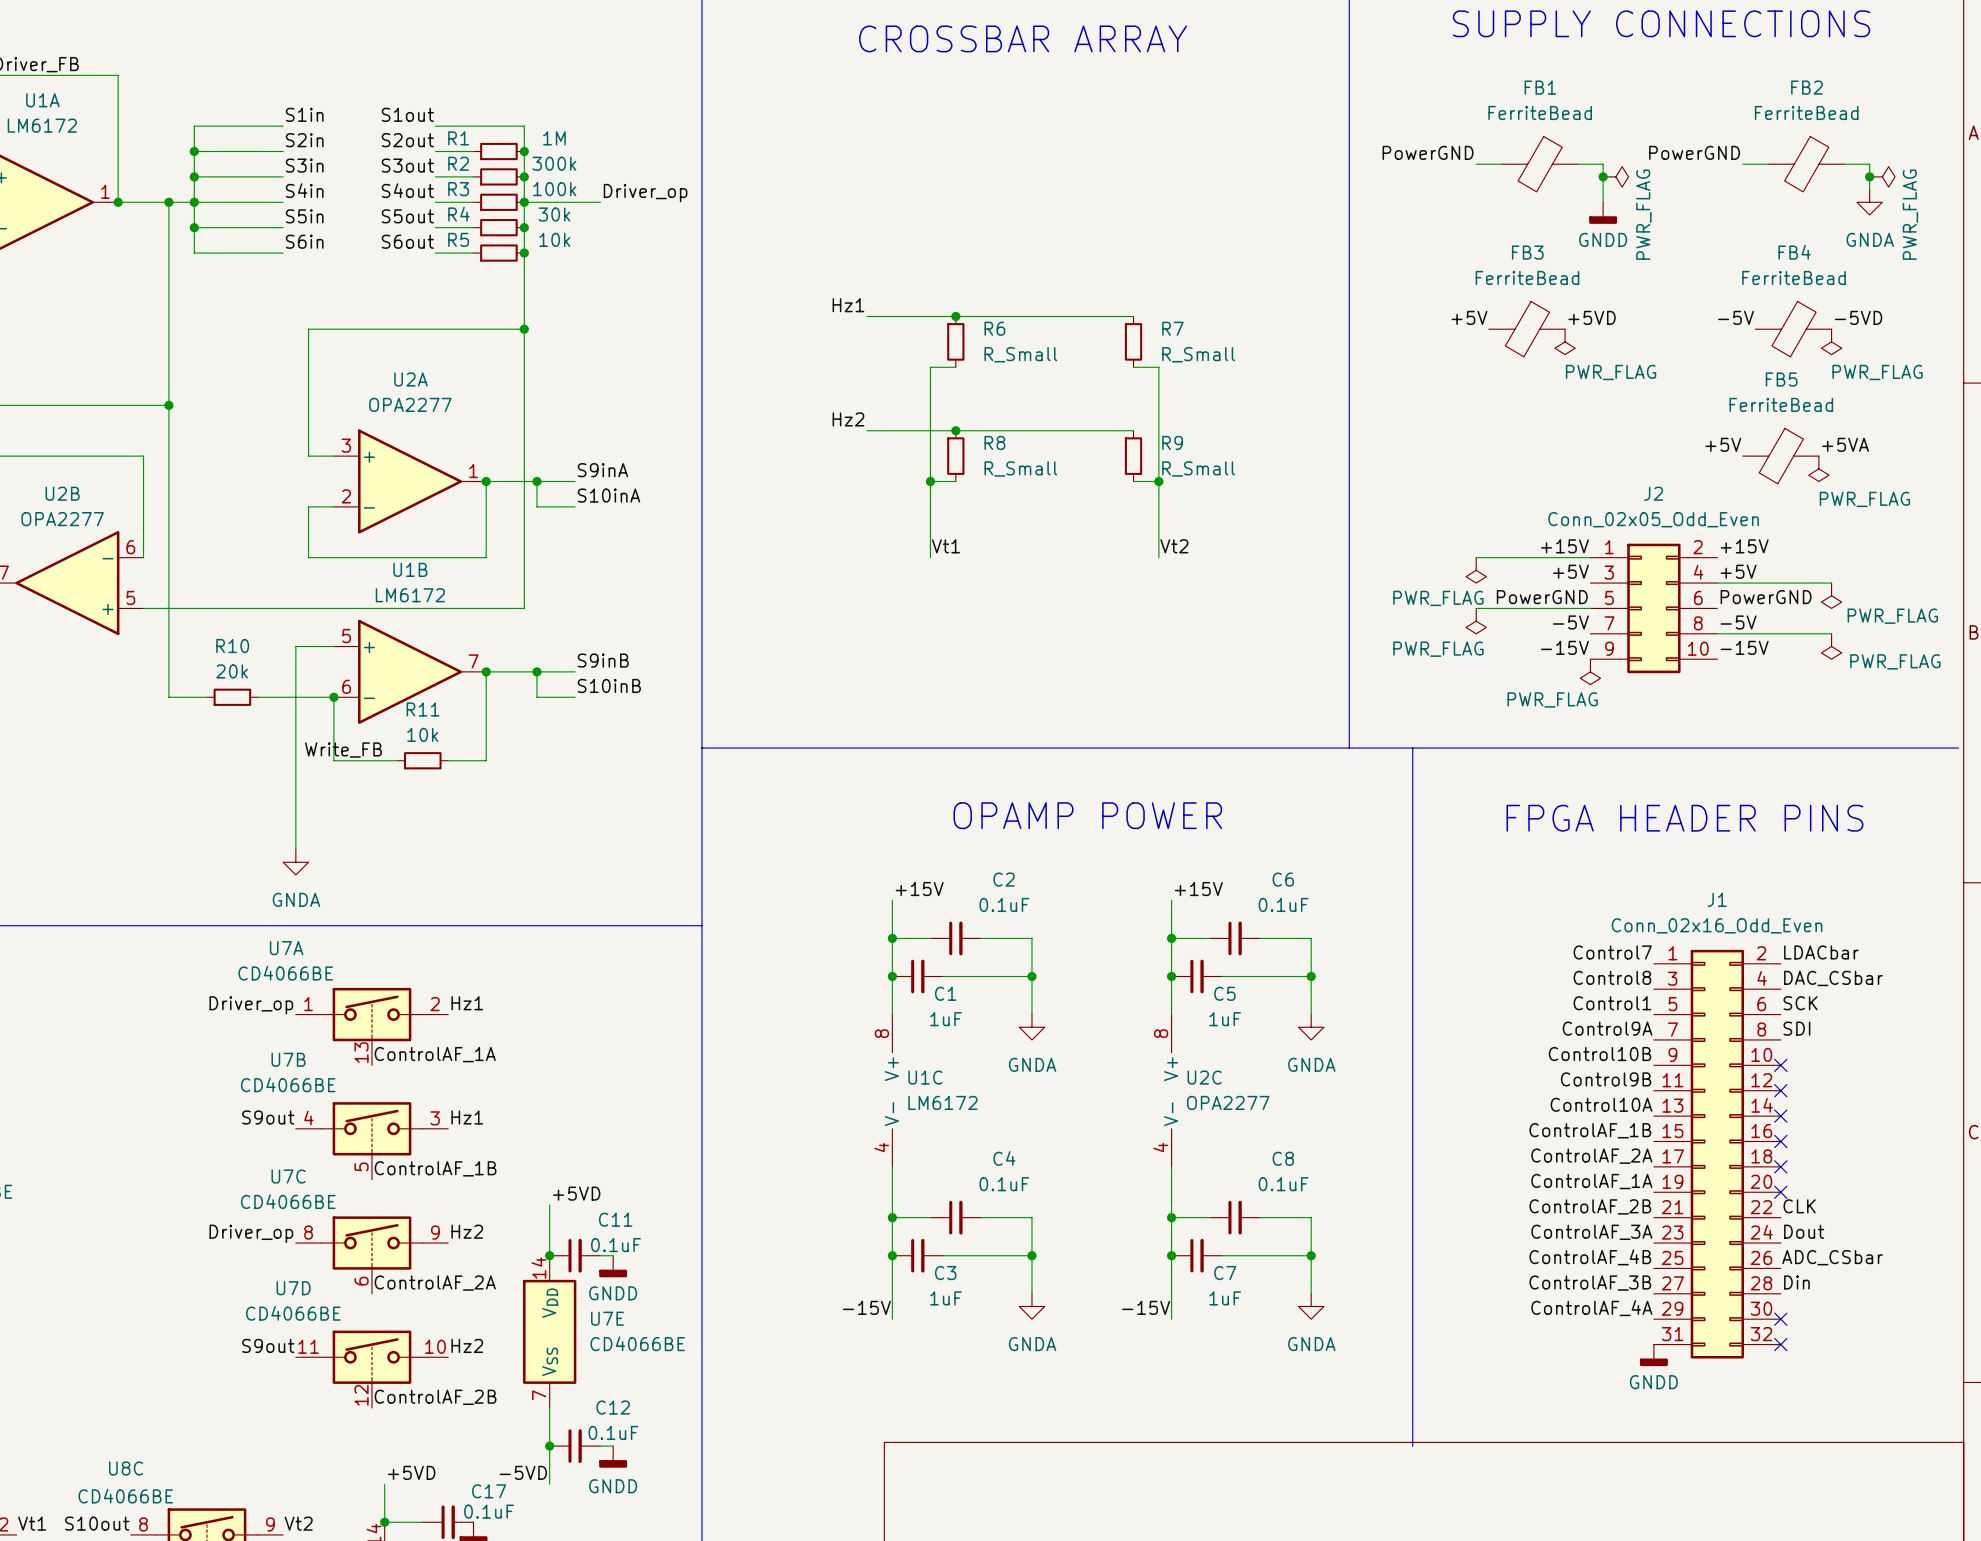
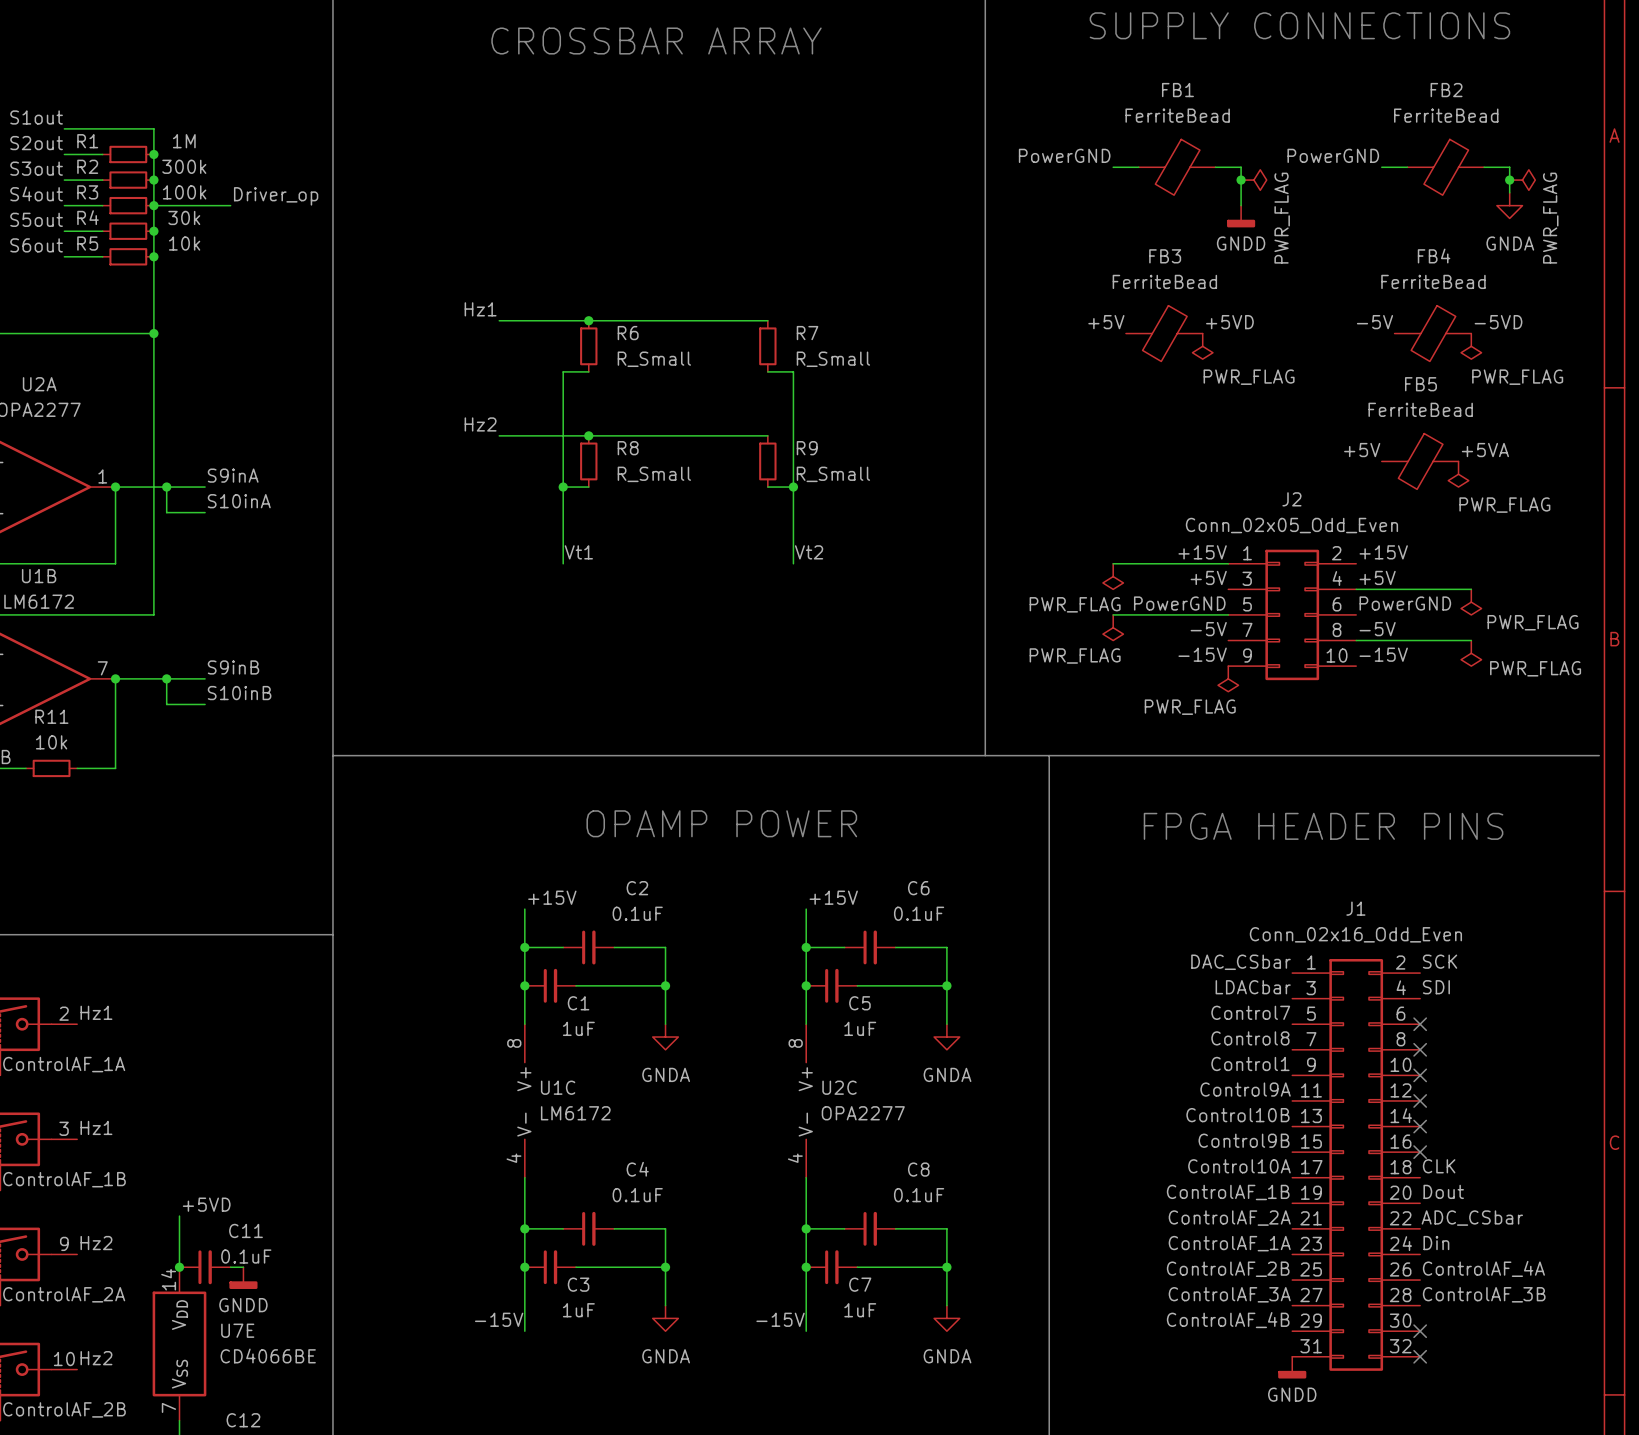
label: Control7 (1612, 952) -> DAC_CSbar (1240, 962)
label: LDACbar (1821, 952) -> SCK (1440, 961)
label: Control8 (1612, 977) -> LDACbar (1253, 987)
label: DAC_CSbar (1833, 978) -> SDI (1436, 987)
label: Control1 (1612, 1003) -> Control7 (1250, 1012)
label: SCK (1800, 1003) -> none
no-connect mark: none -> (1420, 1024)
label: Control9A (1607, 1028) -> Control8 (1250, 1038)
label: SDI (1796, 1028) -> none
no-connect mark: none -> (1420, 1049)
label: Control10B (1600, 1054) -> Control1 (1250, 1063)
label: Control9B (1606, 1079) -> Control9A (1245, 1089)
label: Control10A (1601, 1104) -> Control10B (1237, 1115)
label: ControlAF_1B (1590, 1130) -> Control9B (1244, 1140)
label: none -> CLK (1439, 1166)
label: ControlAF_2A (1591, 1156) -> Control10A (1239, 1166)
no-connect mark: (1780, 1166) -> none
label: none -> Dout (1443, 1191)
label: ControlAF_1A (1591, 1181) -> ControlAF_1B (1228, 1192)
no-connect mark: (1780, 1192) -> none
label: ControlAF_2B (1590, 1206) -> ControlAF_2A (1229, 1218)
label: CLK (1799, 1206) -> ADC_CSbar (1472, 1218)
label: Dout (1804, 1231) -> Din (1436, 1243)
label: ControlAF_3A (1591, 1232) -> ControlAF_1A (1229, 1243)
label: ControlAF_4B (1590, 1257) -> ControlAF_2B (1228, 1269)
label: ADC_CSbar (1832, 1257) -> ControlAF_4A (1483, 1268)
label: Din (1796, 1282) -> ControlAF_3B (1484, 1294)
label: ControlAF_3B (1590, 1283) -> ControlAF_3A (1229, 1294)
label: ControlAF_4A (1591, 1308) -> ControlAF_4B (1228, 1320)

